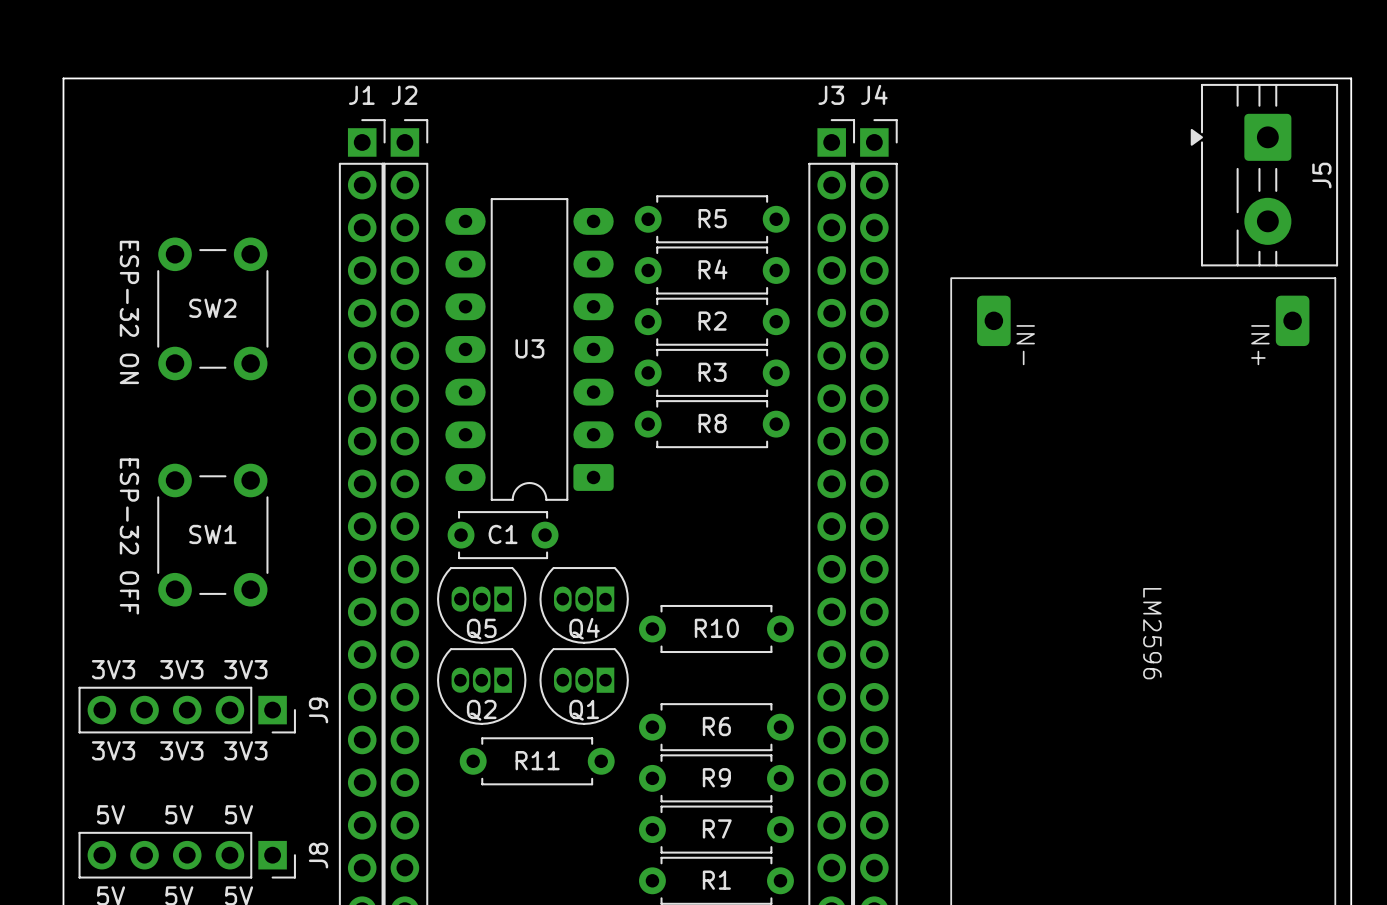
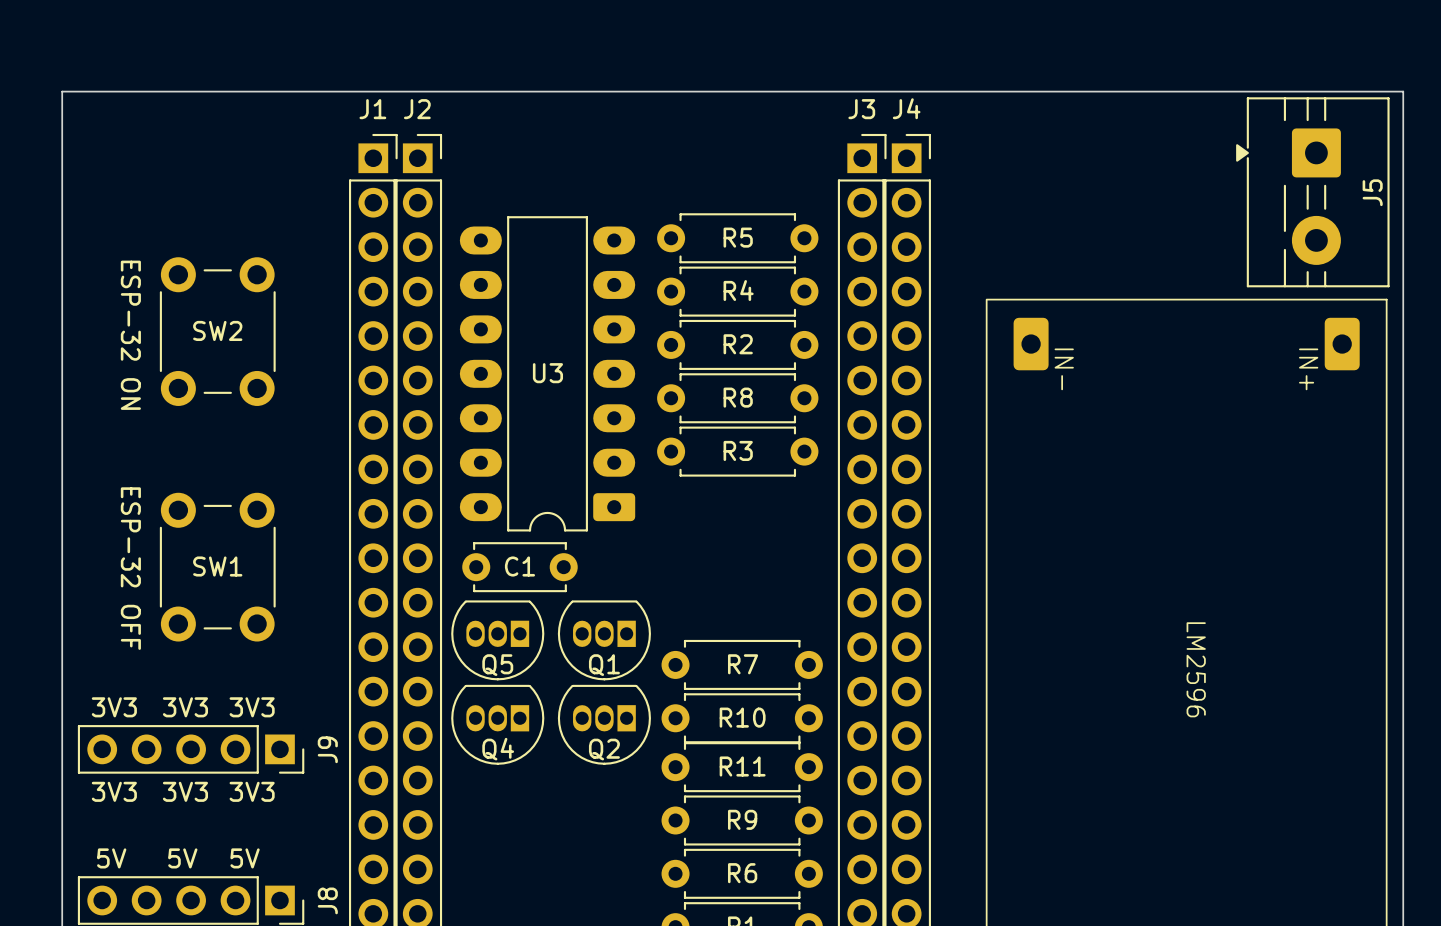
R3 name: R3 (712, 372) -> R8 (738, 397)
R8 name: R8 (712, 423) -> R3 (738, 450)
Q4 name: Q4 (584, 628) -> Q1 (604, 665)
R10 name: R10 (716, 628) -> R7 (743, 664)
R10: none -> (742, 718)
Q2 name: Q2 (481, 710) -> Q4 (498, 749)
Q1 name: Q1 (584, 710) -> Q2 (604, 749)
R6 name: R6 (716, 726) -> R11 (742, 766)
R11: (537, 761) -> none
R7 name: R7 (717, 828) -> R6 (742, 873)

